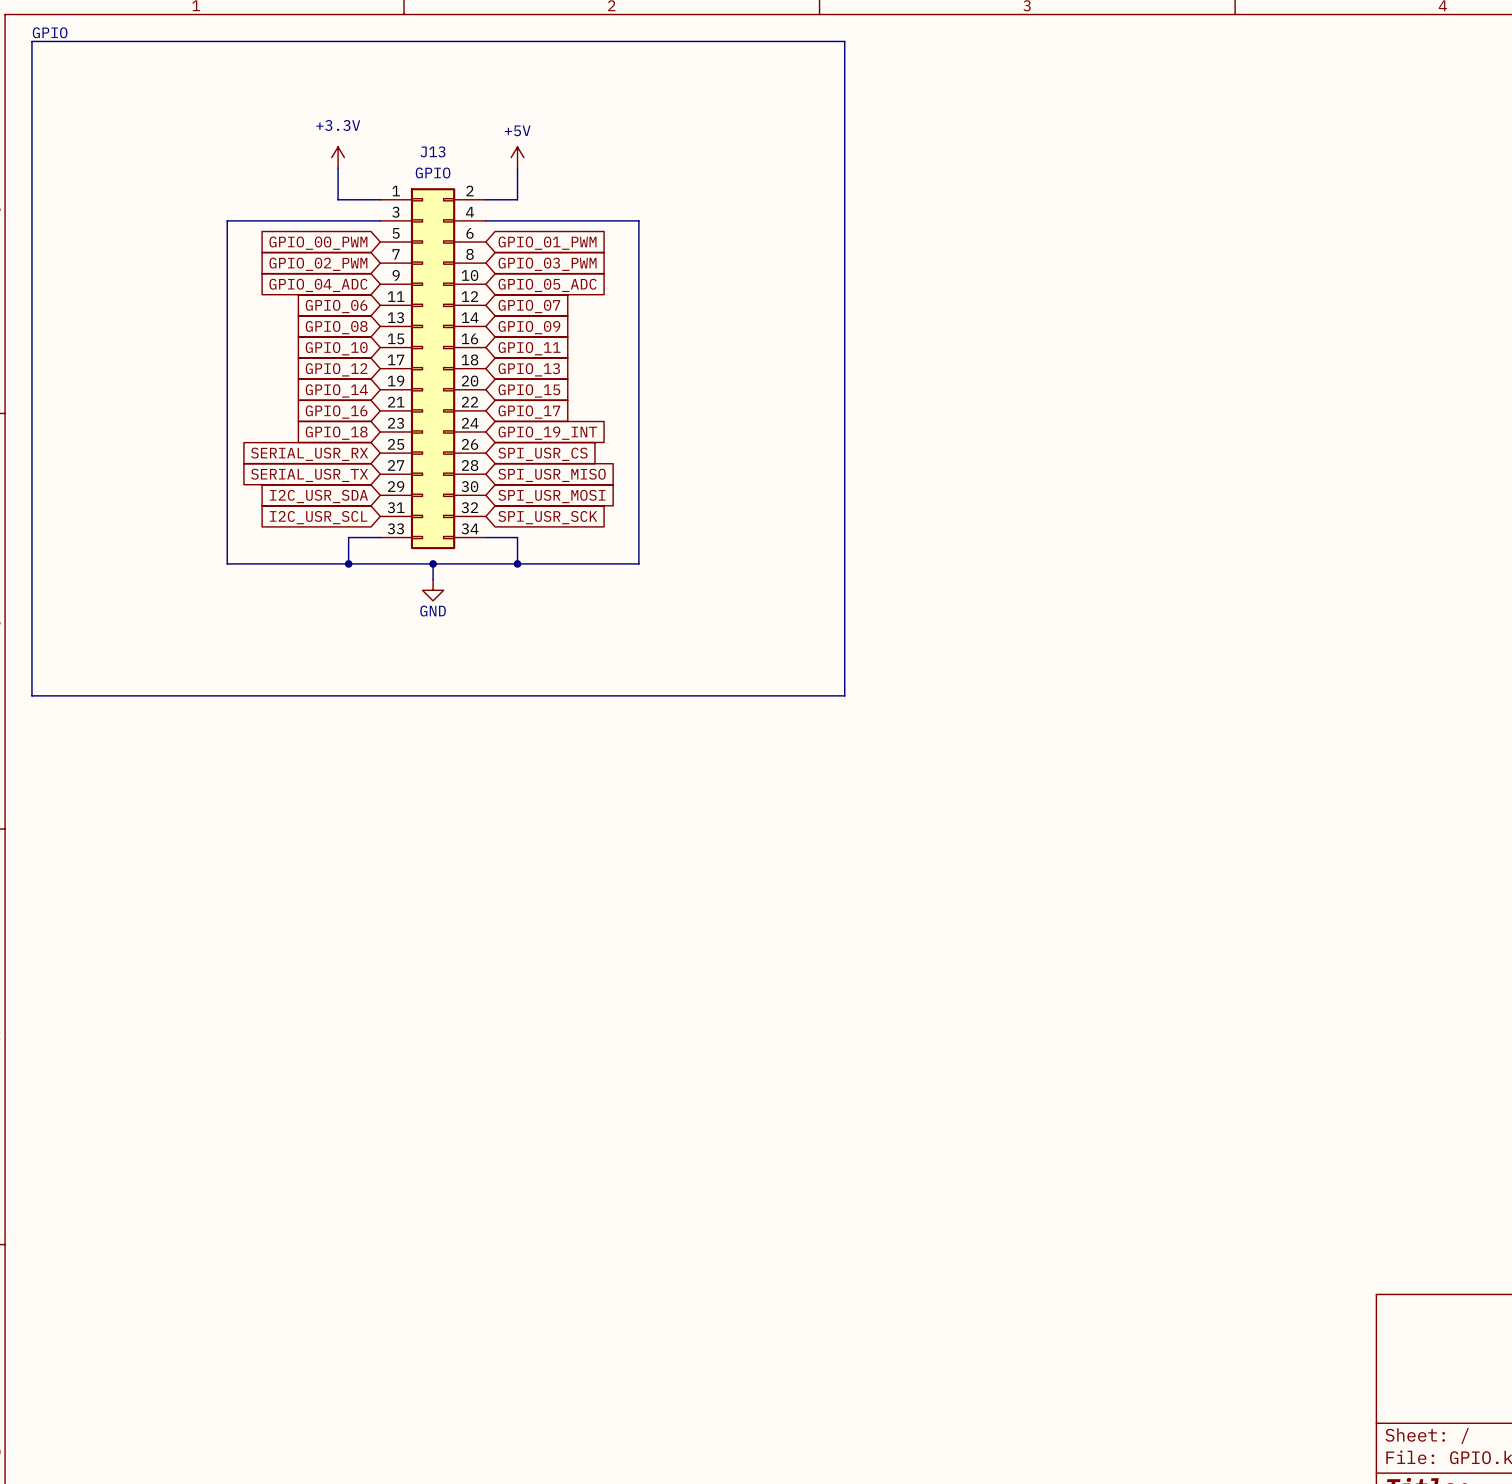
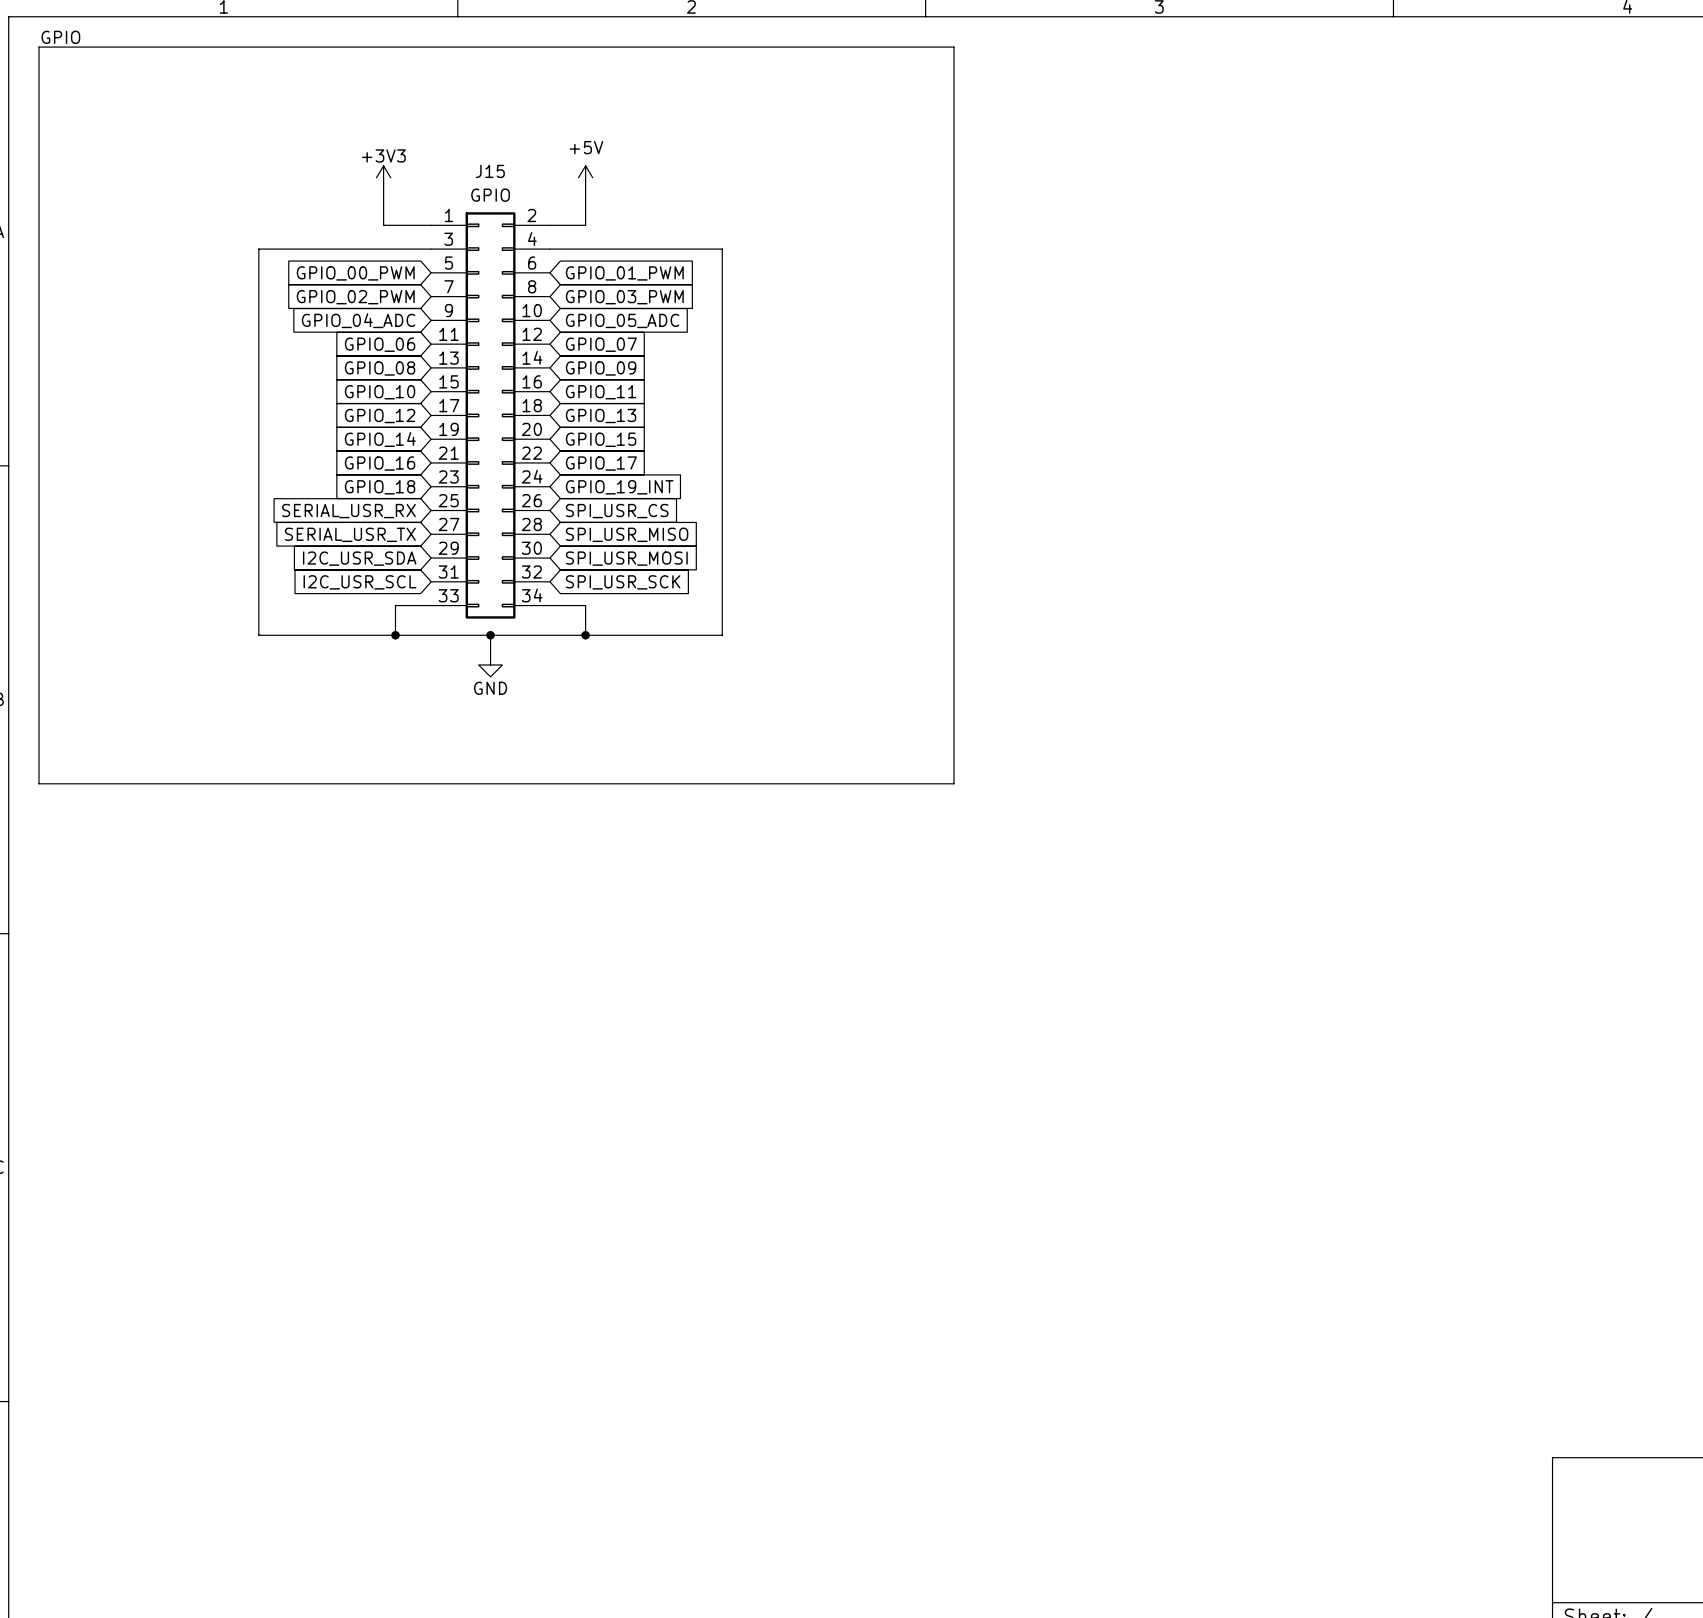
J13 name: J13 (433, 151) -> J15 (490, 171)
power symbol: +3.3V (338, 157) -> +3V3 (383, 177)

